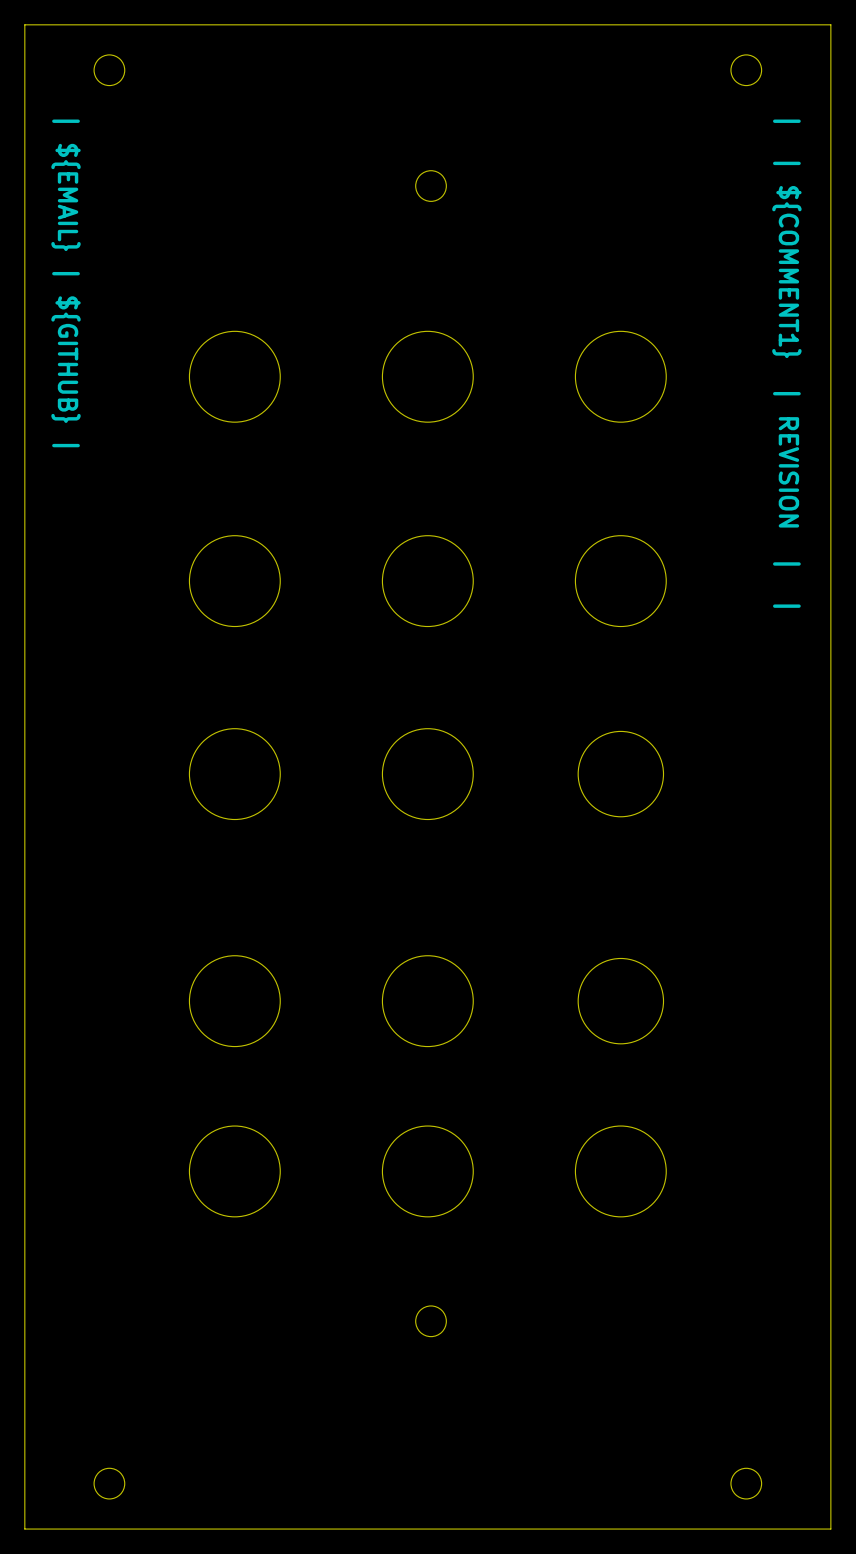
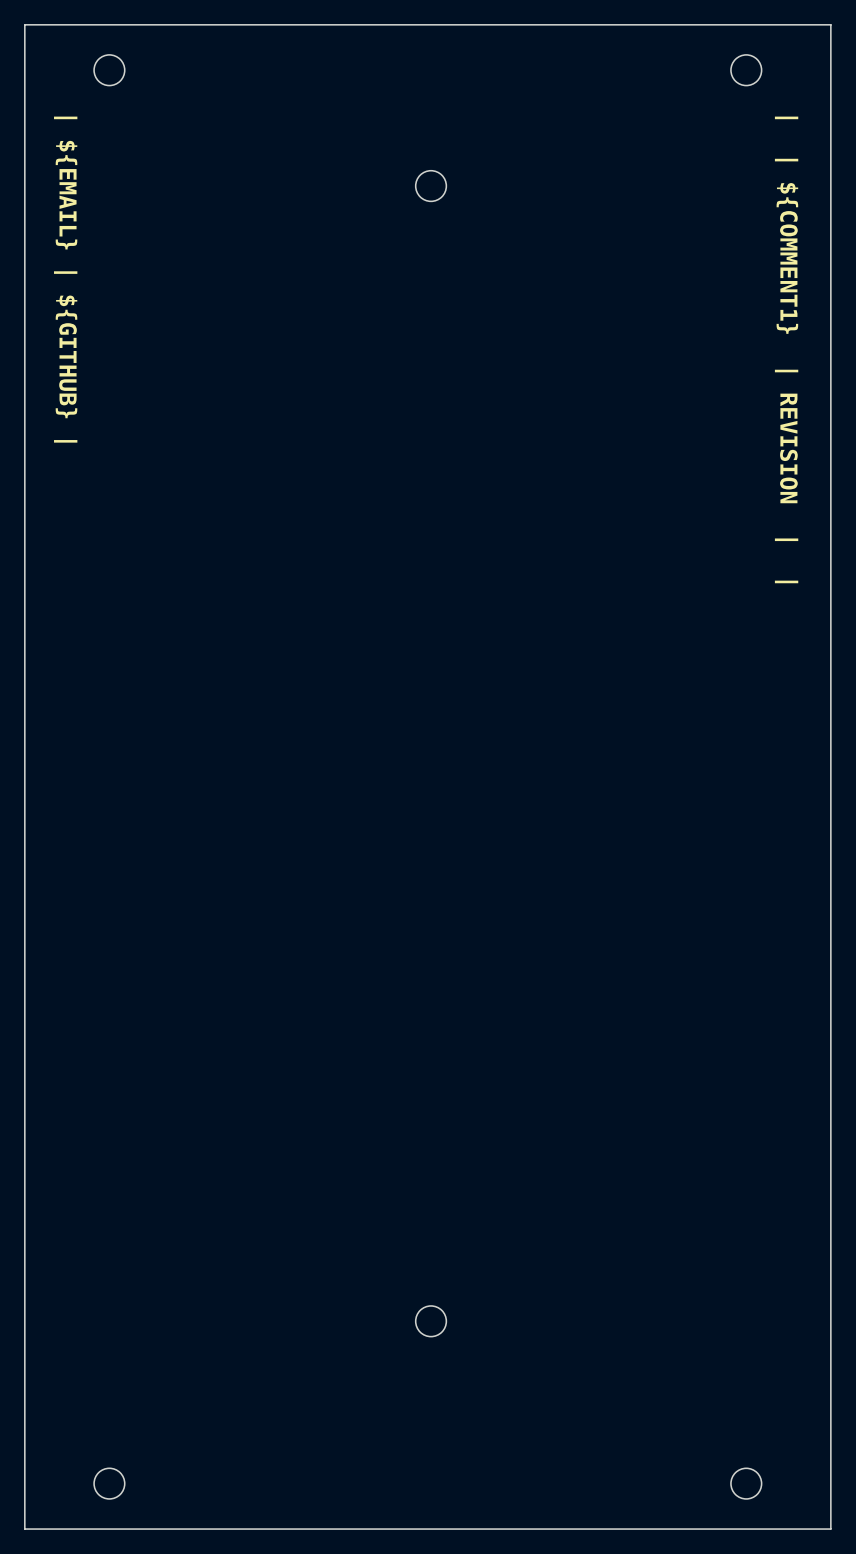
round board edge: [189, 331, 281, 423] -> none
round board edge: [382, 331, 474, 423] -> none
round board edge: [575, 331, 667, 423] -> none
round board edge: [189, 535, 281, 627] -> none
round board edge: [382, 535, 474, 627] -> none
round board edge: [575, 535, 667, 627] -> none
round board edge: [189, 728, 281, 820] -> none
round board edge: [382, 728, 474, 820] -> none
round board edge: [577, 731, 664, 818] -> none
round board edge: [189, 955, 281, 1047] -> none
round board edge: [382, 955, 474, 1047] -> none
round board edge: [577, 958, 664, 1045] -> none
round board edge: [189, 1125, 281, 1218] -> none
round board edge: [382, 1125, 474, 1218] -> none
round board edge: [575, 1125, 667, 1218] -> none

